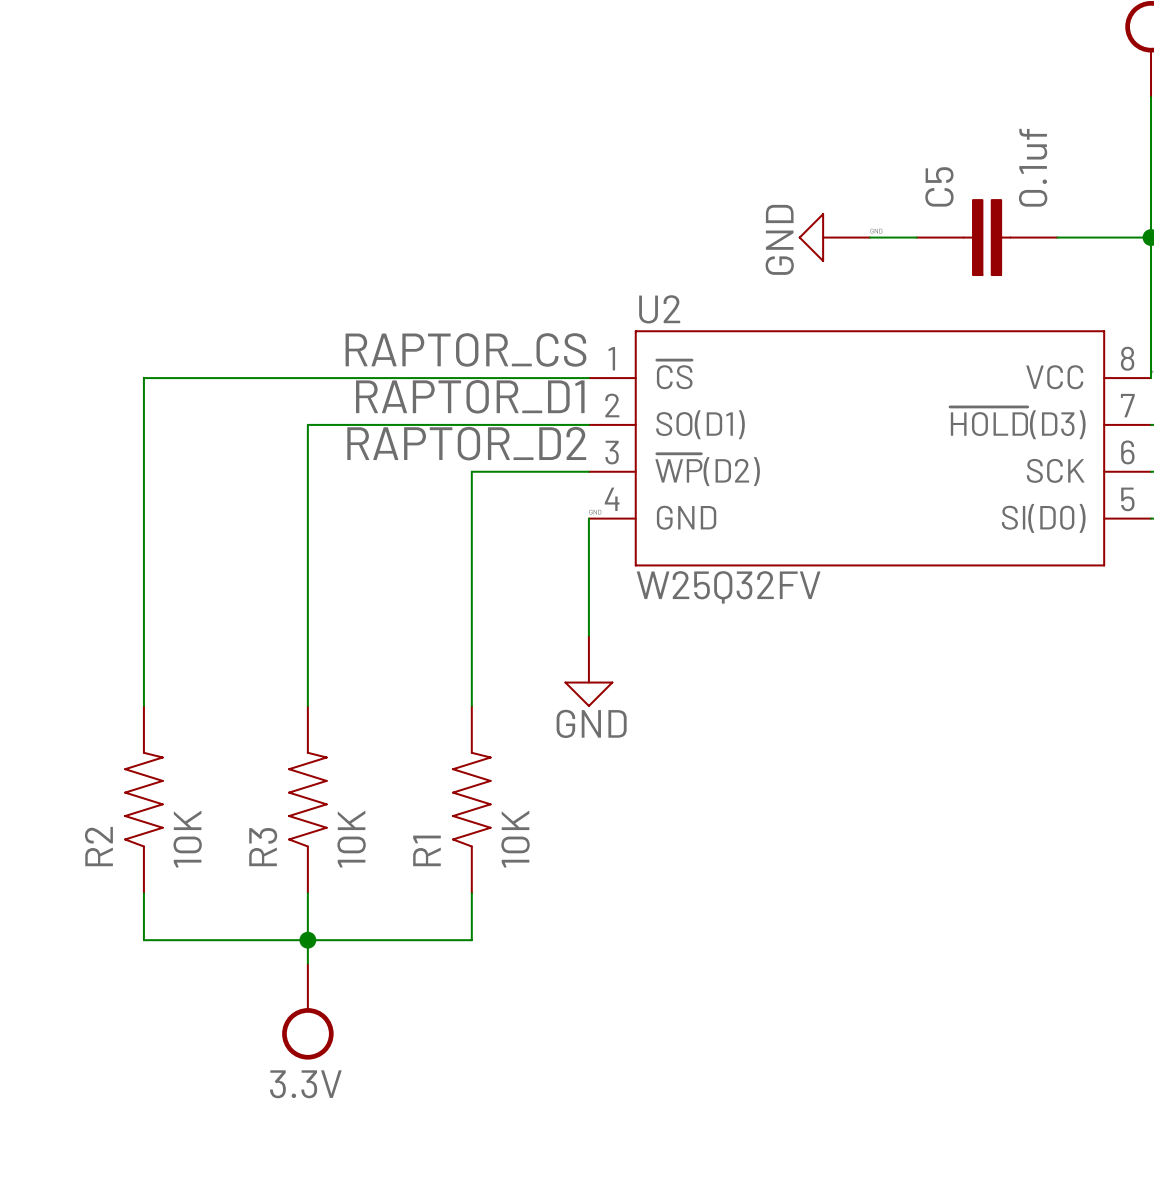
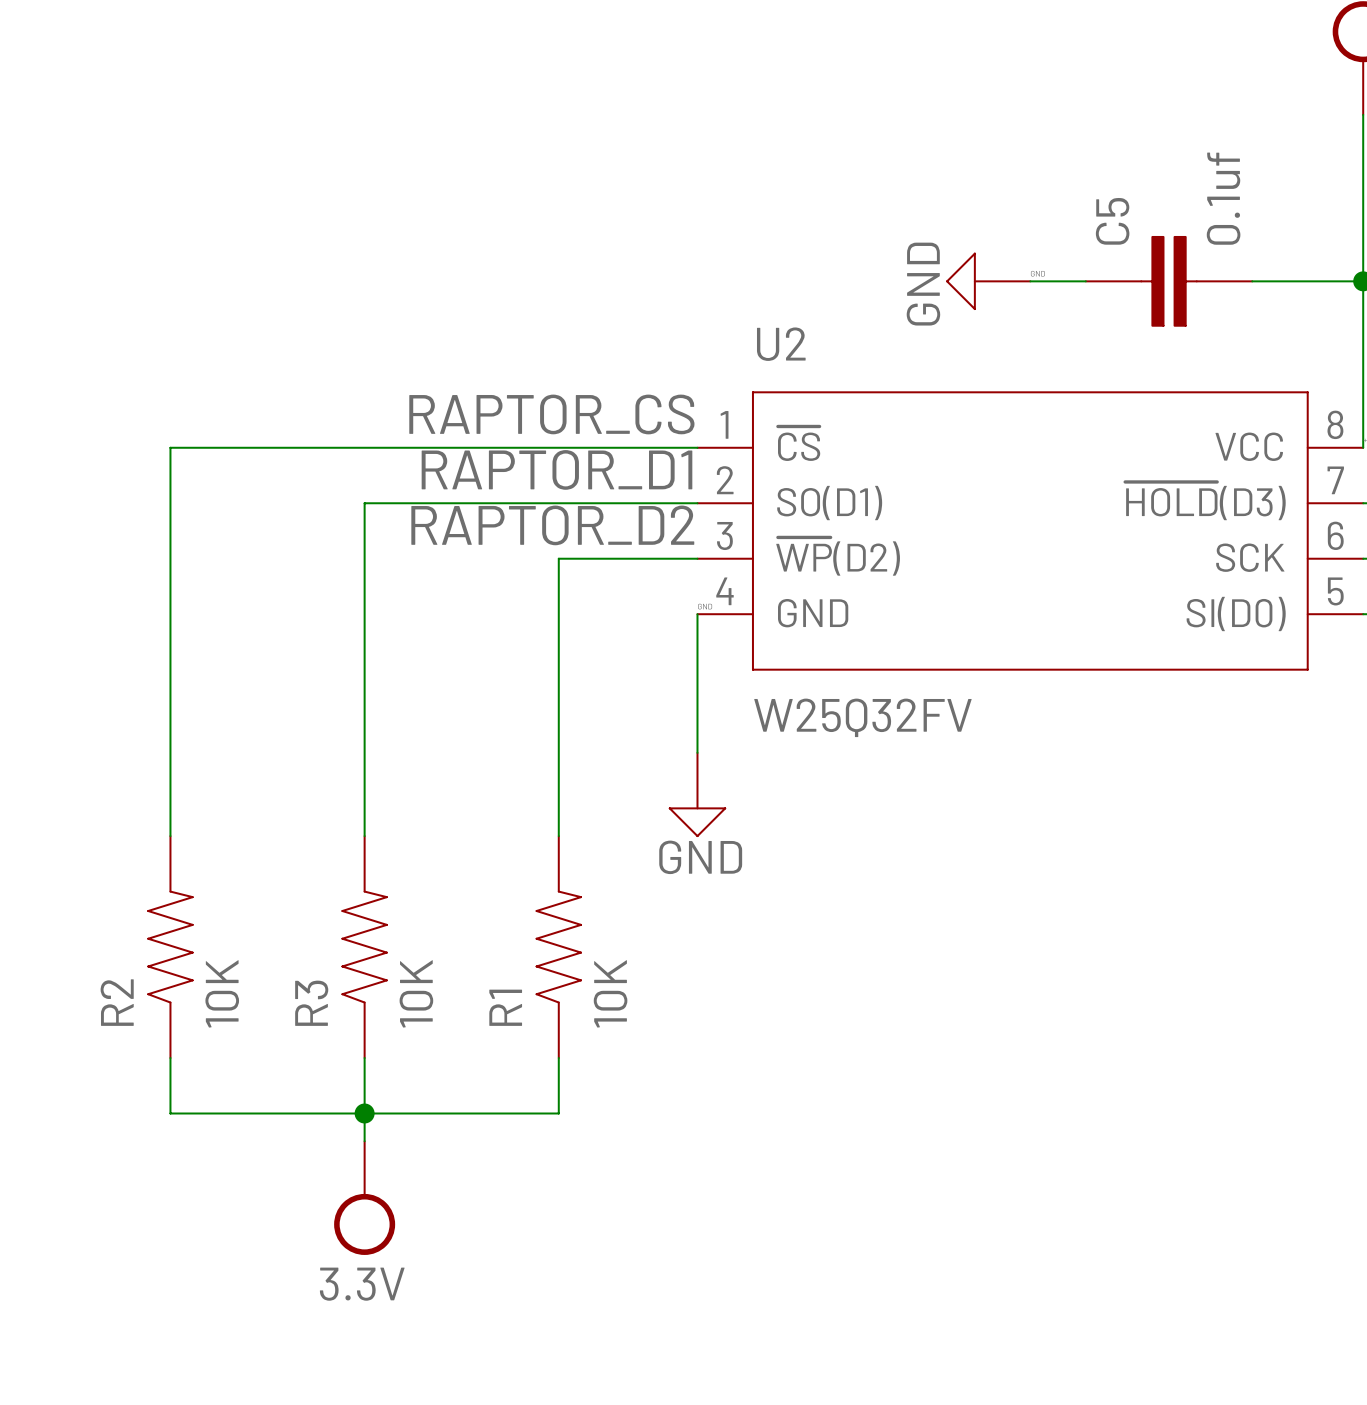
U2 name position: U2 (659, 309) -> U2 (781, 344)
U2 value position: W25Q32FV (728, 587) -> W25Q32FV (862, 717)

